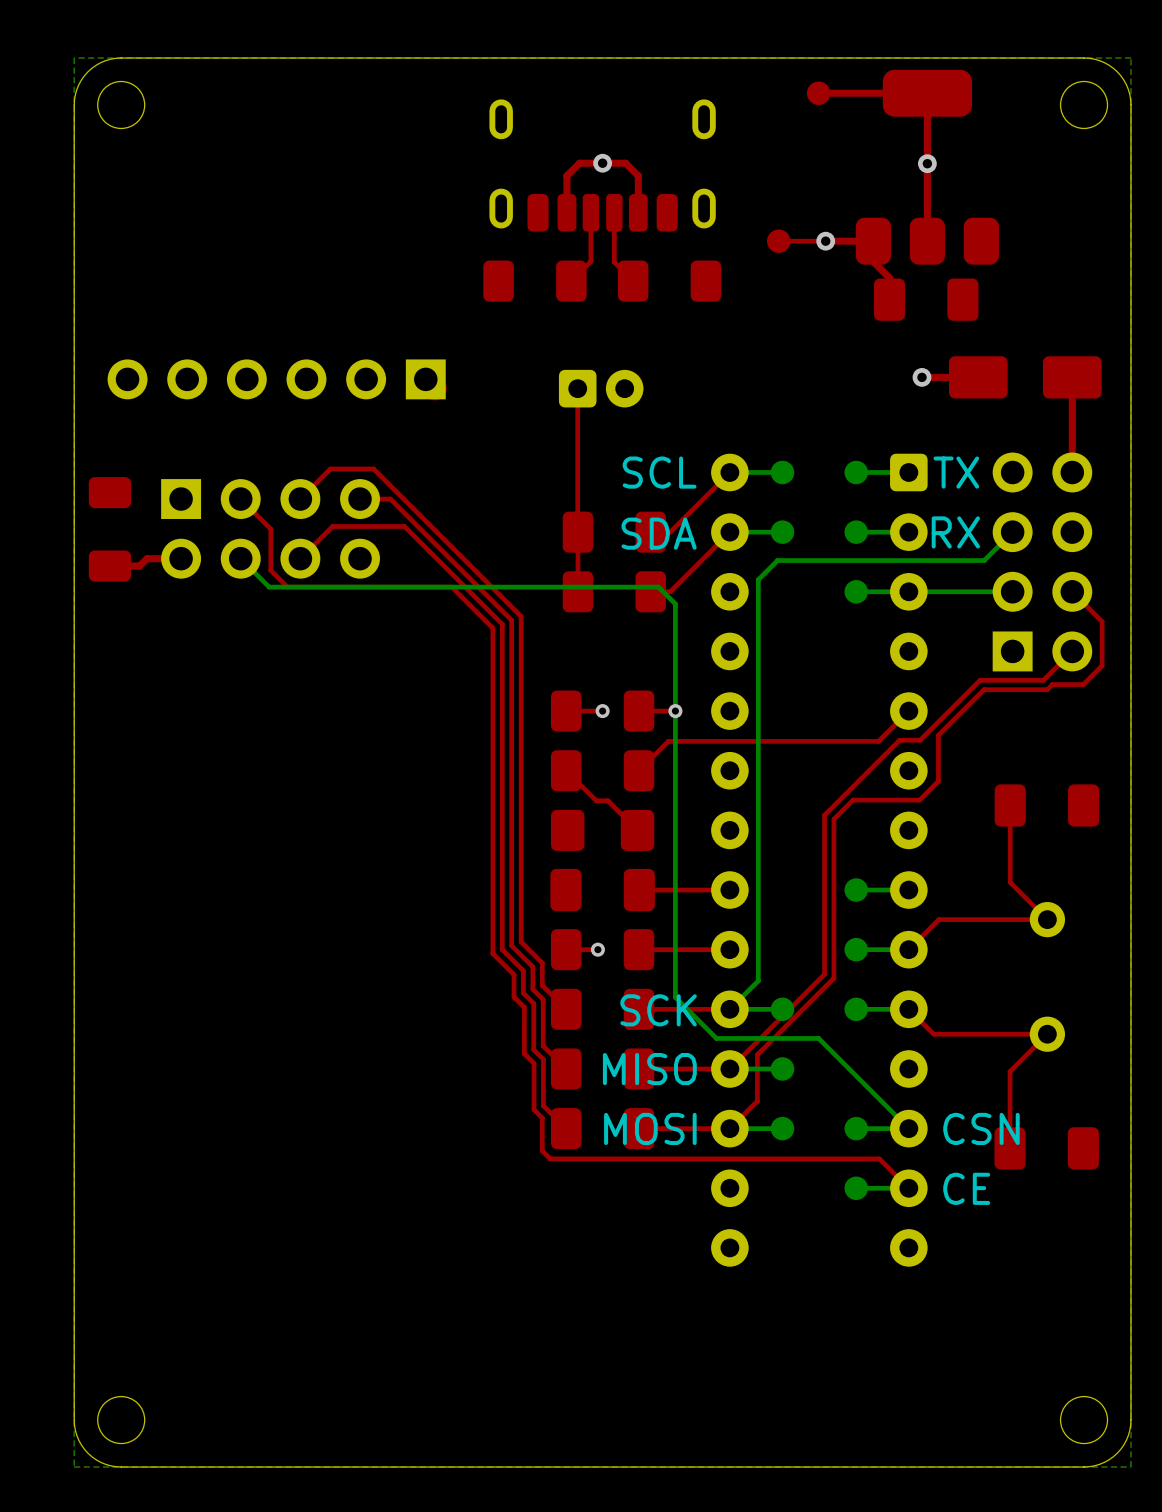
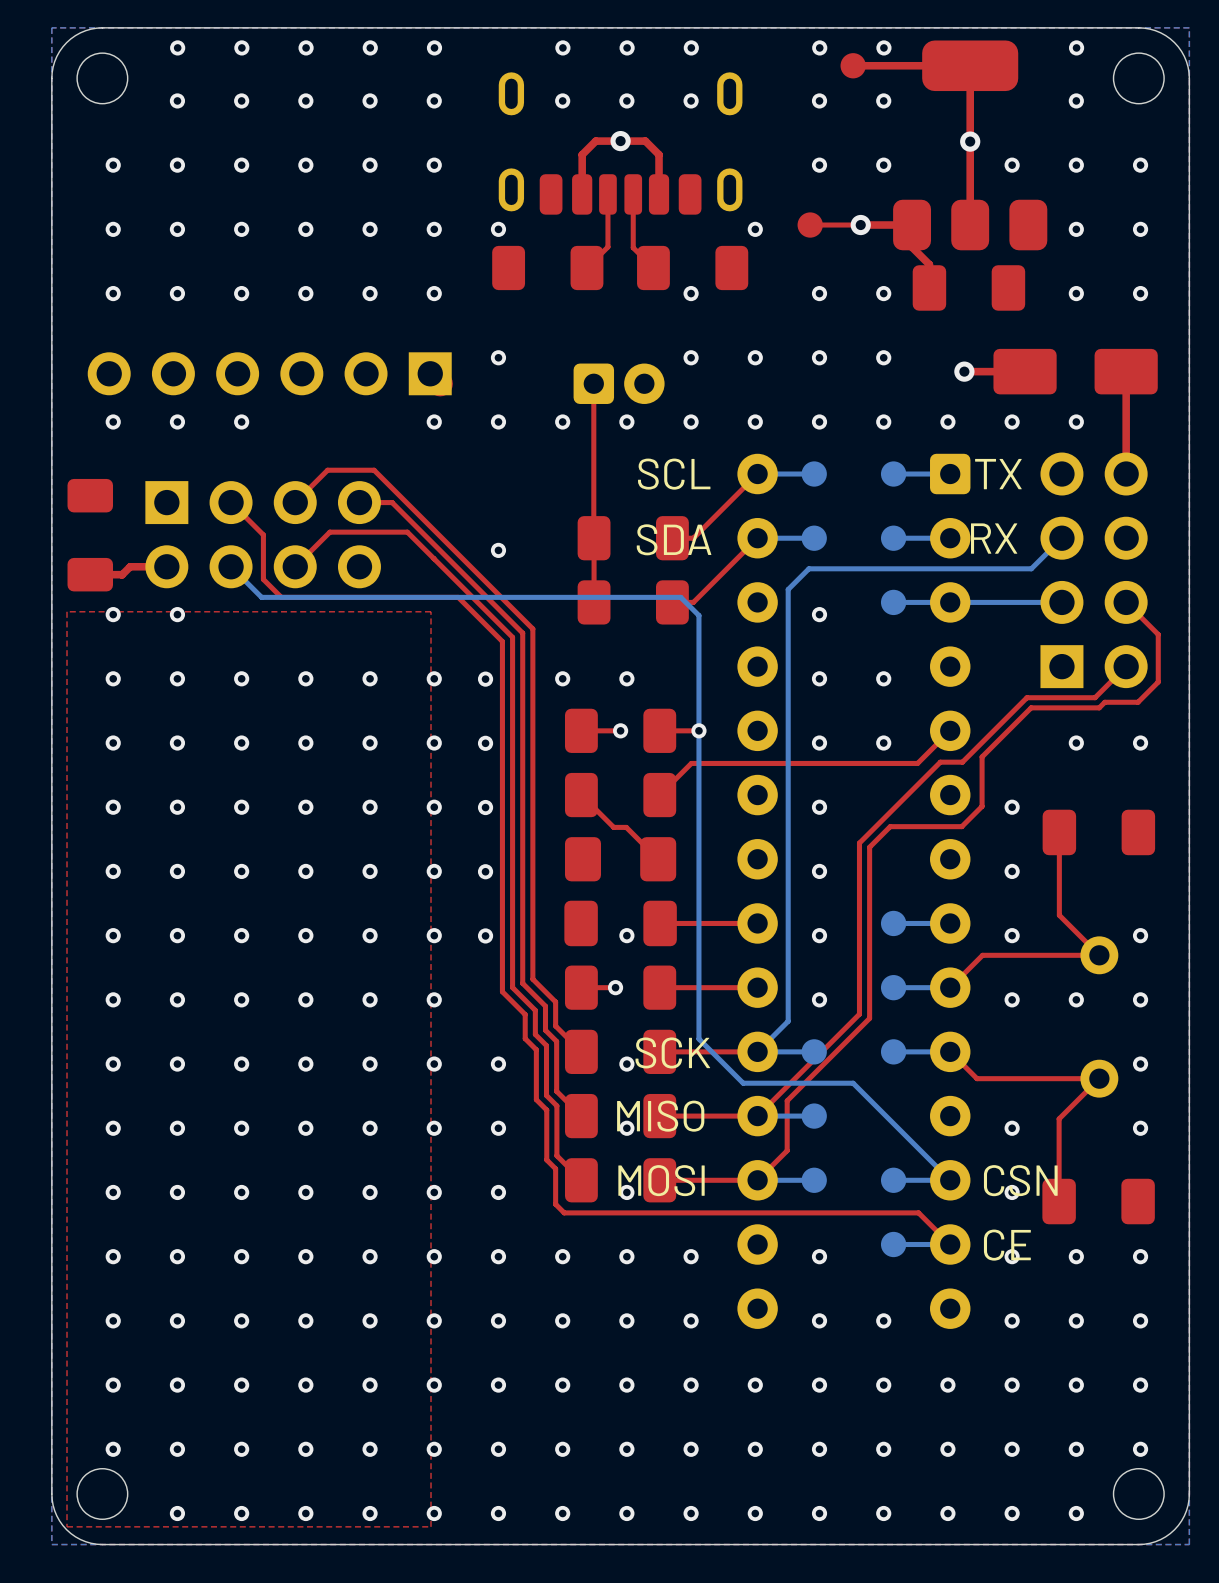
via: none -> (177, 47)
via: none -> (241, 47)
via: none -> (306, 47)
via: none -> (370, 47)
via: none -> (434, 47)
via: none -> (562, 47)
via: none -> (627, 47)
via: none -> (691, 47)
via: none -> (819, 47)
via: none -> (883, 47)
via: none -> (1076, 47)
via: none -> (177, 100)
via: none -> (241, 100)
via: none -> (305, 100)
via: none -> (370, 100)
via: none -> (434, 100)
via: none -> (562, 100)
via: none -> (626, 100)
via: none -> (691, 100)
via: none -> (819, 100)
via: none -> (883, 100)
via: none -> (1076, 100)
via: none -> (113, 165)
via: none -> (177, 165)
via: none -> (241, 165)
via: none -> (305, 165)
via: none -> (370, 165)
via: none -> (434, 165)
via: none -> (819, 165)
via: none -> (883, 165)
via: none -> (1012, 165)
via: none -> (1076, 165)
via: none -> (1140, 165)
via: none -> (113, 229)
via: none -> (177, 229)
via: none -> (241, 229)
via: none -> (305, 229)
via: none -> (370, 229)
via: none -> (434, 229)
via: none -> (498, 229)
via: none -> (755, 229)
via: none -> (1076, 229)
via: none -> (1140, 229)
via: none -> (113, 293)
via: none -> (177, 293)
via: none -> (241, 293)
via: none -> (305, 293)
via: none -> (370, 293)
via: none -> (434, 293)
via: none -> (691, 293)
via: none -> (819, 293)
via: none -> (883, 293)
via: none -> (1076, 293)
via: none -> (1140, 293)
via: none -> (498, 357)
via: none -> (691, 357)
via: none -> (755, 357)
via: none -> (819, 357)
via: none -> (883, 357)
via: none -> (113, 421)
via: none -> (177, 421)
via: none -> (241, 421)
via: none -> (434, 421)
via: none -> (498, 421)
via: none -> (562, 421)
via: none -> (626, 421)
via: none -> (691, 421)
via: none -> (755, 421)
via: none -> (819, 421)
via: none -> (883, 421)
via: none -> (947, 421)
via: none -> (1012, 421)
via: none -> (1076, 421)
via: none -> (498, 550)
top zone outline: none -> (431, 611) (67, 611) (67, 1526) (431, 1526) (431, 611)
via: none -> (113, 614)
via: none -> (177, 614)
via: none -> (819, 614)
via: none -> (113, 678)
via: none -> (177, 678)
via: none -> (241, 678)
via: none -> (305, 678)
via: none -> (370, 678)
via: none -> (434, 678)
via: none -> (562, 678)
via: none -> (626, 678)
via: none -> (819, 678)
via: none -> (883, 678)
via: none -> (485, 679)
via: none -> (113, 743)
via: none -> (177, 743)
via: none -> (241, 743)
via: none -> (305, 743)
via: none -> (370, 743)
via: none -> (434, 743)
via: none -> (485, 743)
via: none -> (819, 743)
via: none -> (883, 743)
via: none -> (1076, 743)
via: none -> (1140, 743)
via: none -> (113, 807)
via: none -> (177, 807)
via: none -> (241, 807)
via: none -> (305, 807)
via: none -> (370, 807)
via: none -> (434, 807)
via: none -> (485, 807)
via: none -> (819, 807)
via: none -> (1012, 807)
via: none -> (113, 871)
via: none -> (177, 871)
via: none -> (241, 871)
via: none -> (305, 871)
via: none -> (370, 871)
via: none -> (434, 871)
via: none -> (485, 871)
via: none -> (819, 871)
via: none -> (1012, 871)
via: none -> (113, 935)
via: none -> (177, 935)
via: none -> (241, 935)
via: none -> (305, 935)
via: none -> (370, 935)
via: none -> (434, 935)
via: none -> (485, 935)
via: none -> (626, 935)
via: none -> (819, 935)
via: none -> (1012, 935)
via: none -> (1140, 935)
via: none -> (113, 999)
via: none -> (177, 999)
via: none -> (241, 999)
via: none -> (305, 999)
via: none -> (370, 999)
via: none -> (434, 999)
via: none -> (819, 999)
via: none -> (1012, 999)
via: none -> (1076, 999)
via: none -> (1140, 999)
via: none -> (113, 1064)
via: none -> (177, 1064)
via: none -> (241, 1064)
via: none -> (305, 1064)
via: none -> (370, 1064)
via: none -> (434, 1064)
via: none -> (498, 1064)
via: none -> (626, 1064)
via: none -> (1140, 1064)
via: none -> (113, 1128)
via: none -> (177, 1128)
via: none -> (241, 1128)
via: none -> (305, 1128)
via: none -> (370, 1128)
via: none -> (434, 1128)
via: none -> (498, 1128)
via: none -> (626, 1128)
via: none -> (1012, 1128)
via: none -> (1140, 1128)
via: none -> (113, 1192)
via: none -> (177, 1192)
via: none -> (241, 1192)
via: none -> (305, 1192)
via: none -> (370, 1192)
via: none -> (434, 1192)
via: none -> (498, 1192)
via: none -> (626, 1192)
via: none -> (1012, 1192)
via: none -> (113, 1256)
via: none -> (177, 1256)
via: none -> (241, 1256)
via: none -> (305, 1256)
via: none -> (370, 1256)
via: none -> (434, 1256)
via: none -> (498, 1256)
via: none -> (562, 1256)
via: none -> (626, 1256)
via: none -> (691, 1256)
via: none -> (819, 1256)
via: none -> (1012, 1256)
via: none -> (1076, 1256)
via: none -> (1140, 1256)
via: none -> (113, 1320)
via: none -> (177, 1320)
via: none -> (241, 1320)
via: none -> (305, 1320)
via: none -> (370, 1320)
via: none -> (434, 1320)
via: none -> (498, 1320)
via: none -> (562, 1320)
via: none -> (626, 1320)
via: none -> (691, 1320)
via: none -> (819, 1320)
via: none -> (883, 1320)
via: none -> (1012, 1320)
via: none -> (1076, 1320)
via: none -> (1140, 1320)
via: none -> (113, 1385)
via: none -> (177, 1385)
via: none -> (241, 1385)
via: none -> (305, 1385)
via: none -> (370, 1385)
via: none -> (434, 1385)
via: none -> (498, 1385)
via: none -> (562, 1385)
via: none -> (626, 1385)
via: none -> (691, 1385)
via: none -> (755, 1385)
via: none -> (819, 1385)
via: none -> (883, 1385)
via: none -> (947, 1385)
via: none -> (1012, 1385)
via: none -> (1076, 1385)
via: none -> (1140, 1385)
via: none -> (113, 1449)
via: none -> (177, 1449)
via: none -> (241, 1449)
via: none -> (305, 1449)
via: none -> (370, 1449)
via: none -> (434, 1449)
via: none -> (498, 1449)
via: none -> (562, 1449)
via: none -> (626, 1449)
via: none -> (691, 1449)
via: none -> (755, 1449)
via: none -> (819, 1449)
via: none -> (883, 1449)
via: none -> (947, 1449)
via: none -> (1012, 1449)
via: none -> (1076, 1449)
via: none -> (1140, 1449)
via: none -> (177, 1513)
via: none -> (241, 1513)
via: none -> (305, 1513)
via: none -> (370, 1513)
via: none -> (434, 1513)
via: none -> (498, 1513)
via: none -> (562, 1513)
via: none -> (626, 1513)
via: none -> (691, 1513)
via: none -> (755, 1513)
via: none -> (819, 1513)
via: none -> (883, 1513)
via: none -> (947, 1513)
via: none -> (1012, 1513)
via: none -> (1076, 1513)

